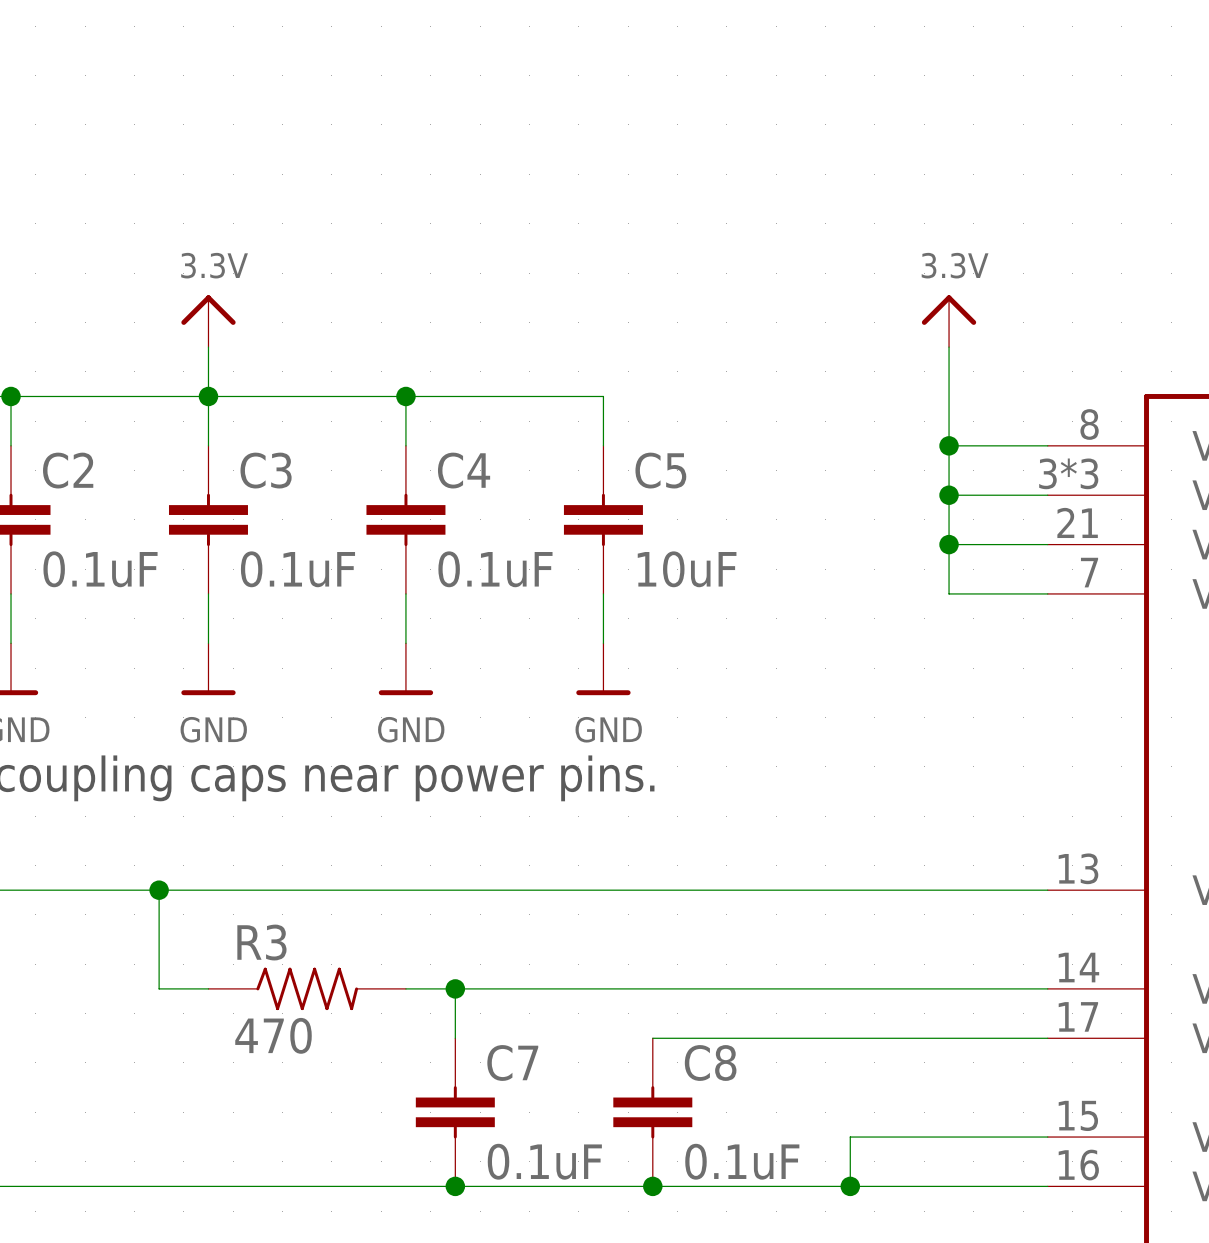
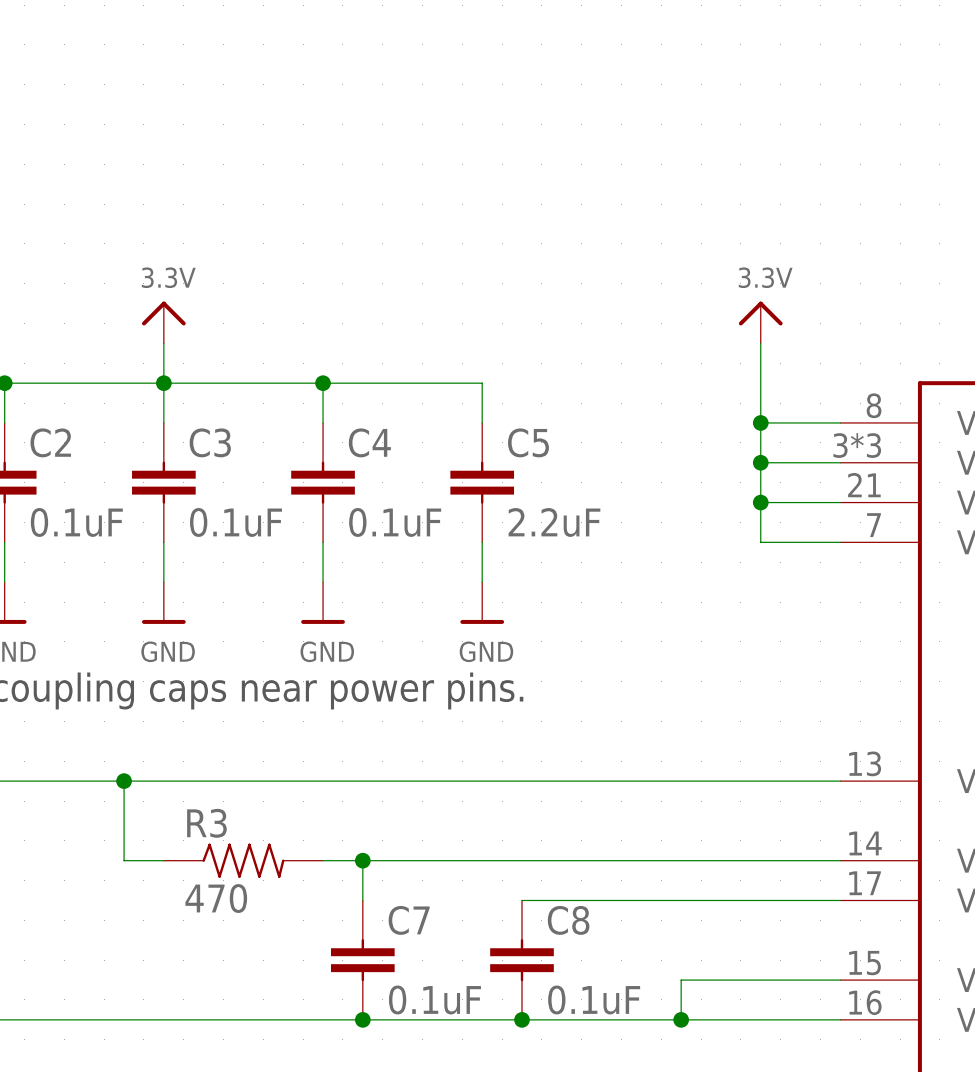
C5 value: 10uF (687, 569) -> 2.2uF (554, 522)

